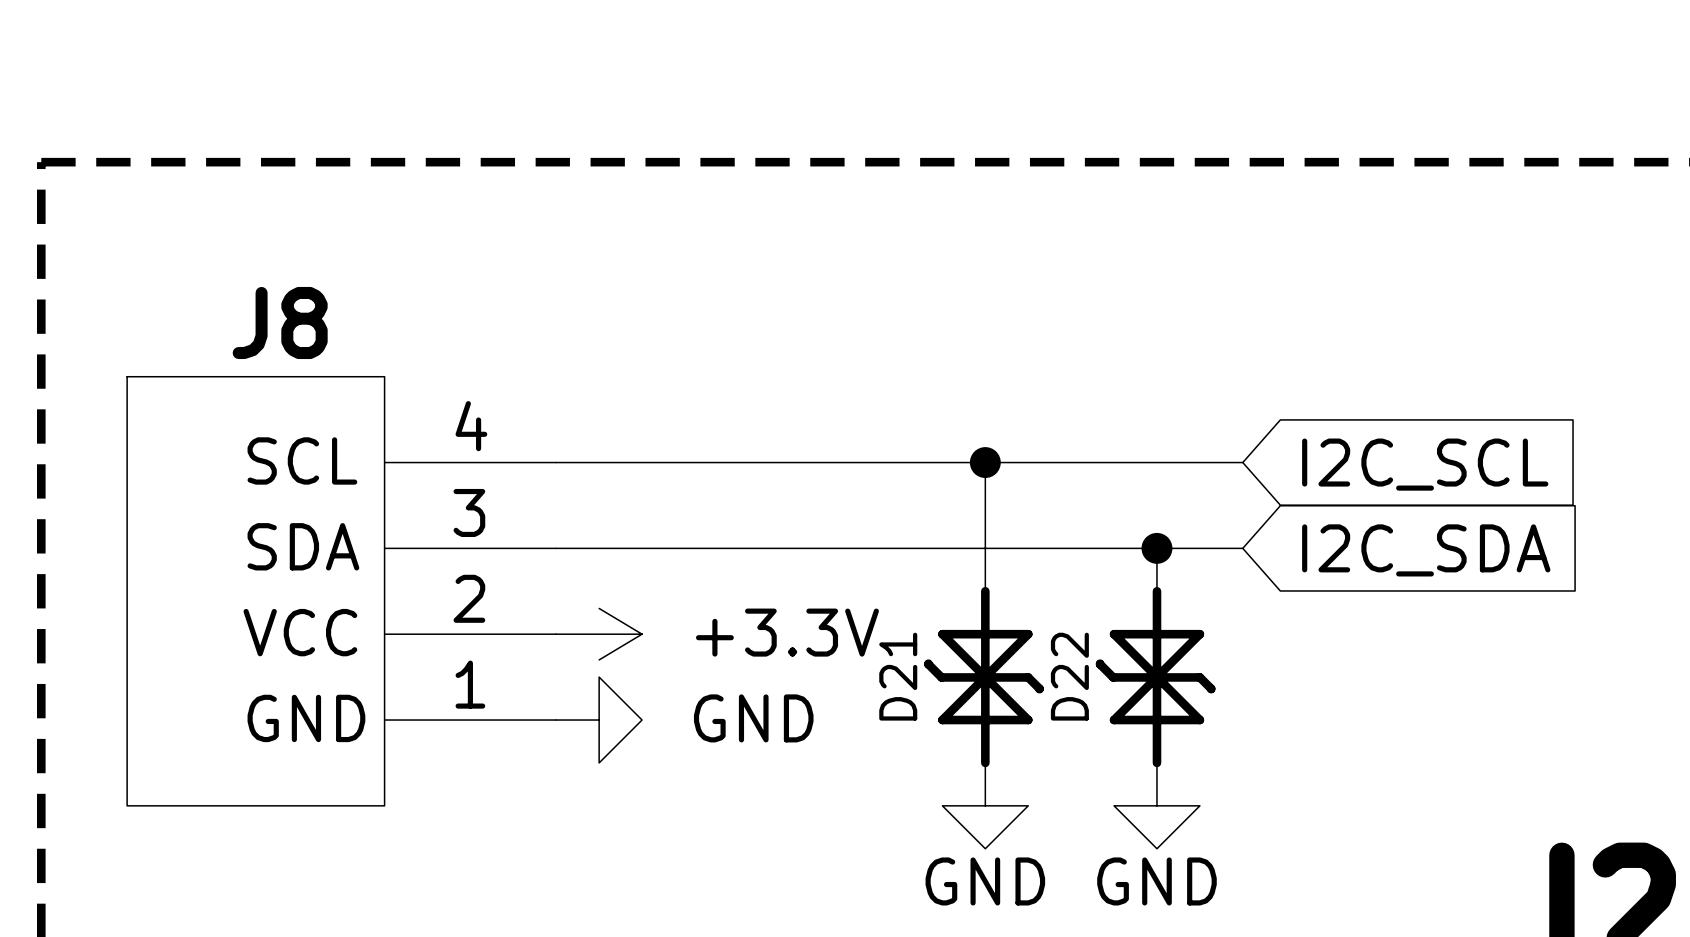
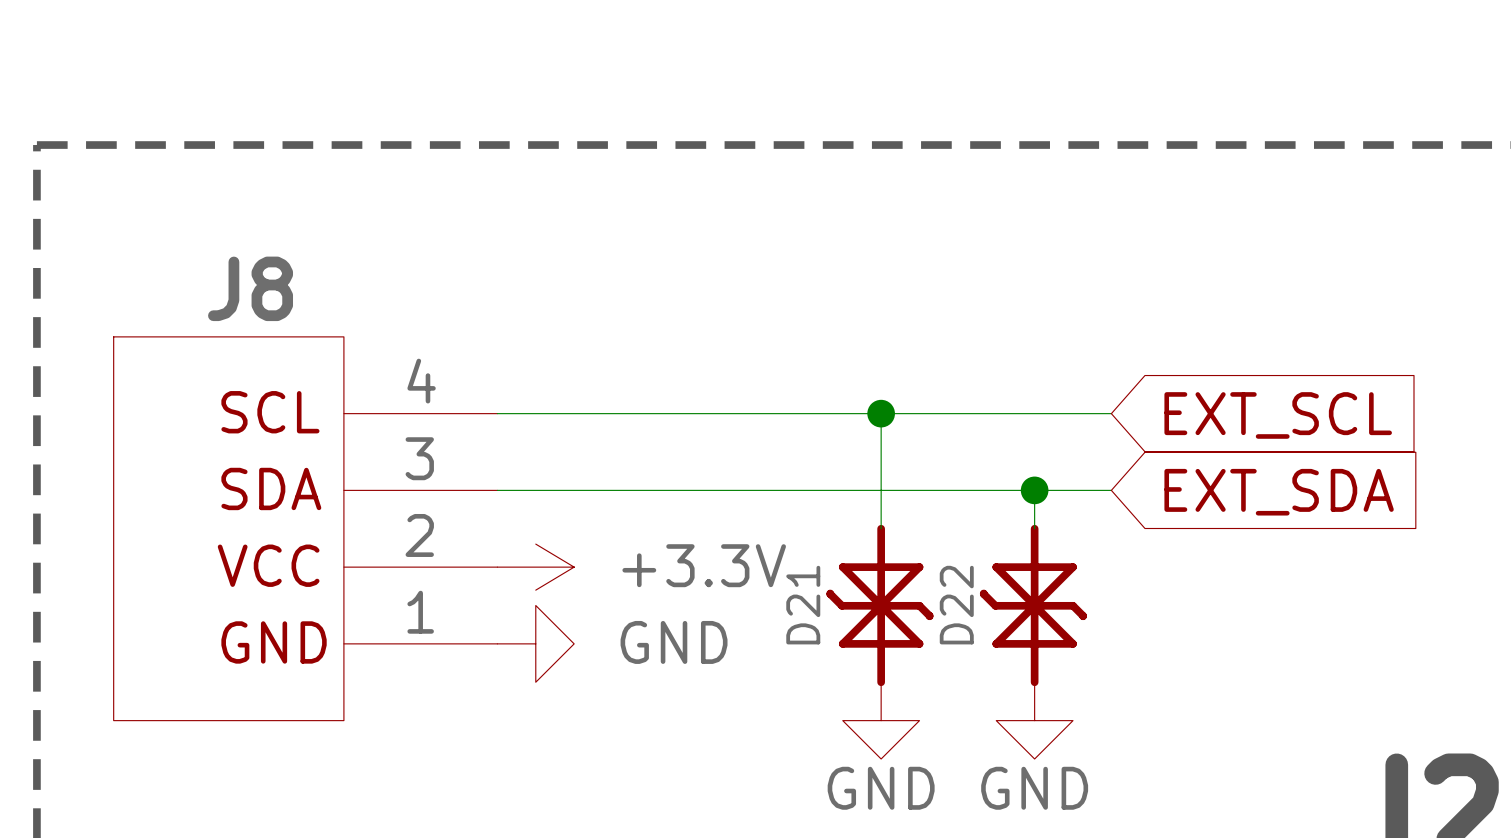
global label: I2C_SCL (1425, 464) -> EXT_SCL (1278, 415)
global label: I2C_SDA (1426, 550) -> EXT_SDA (1279, 492)

